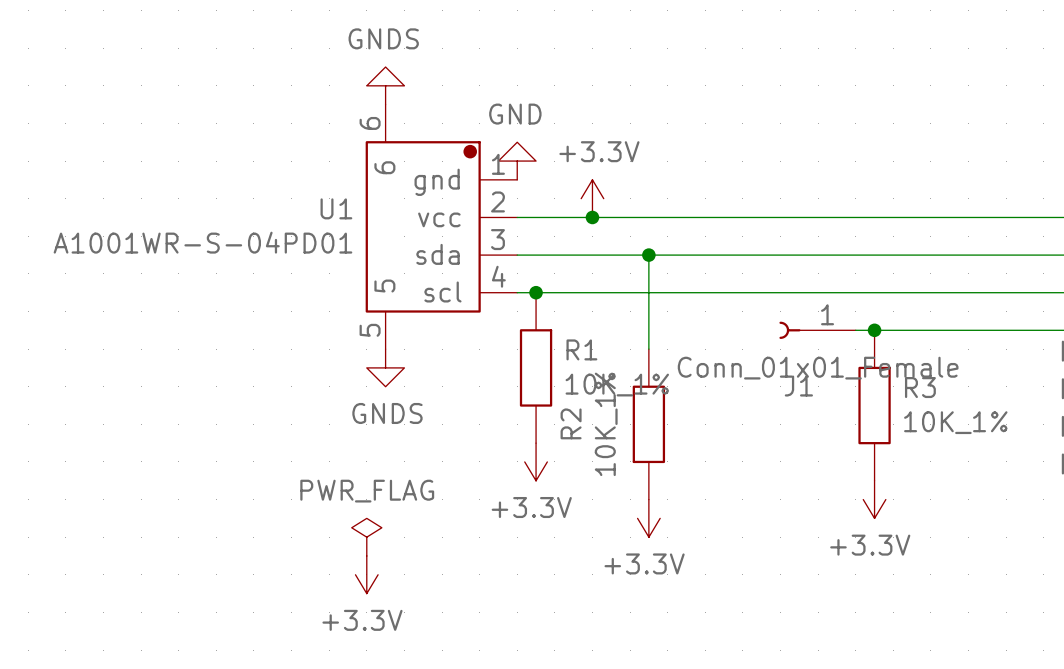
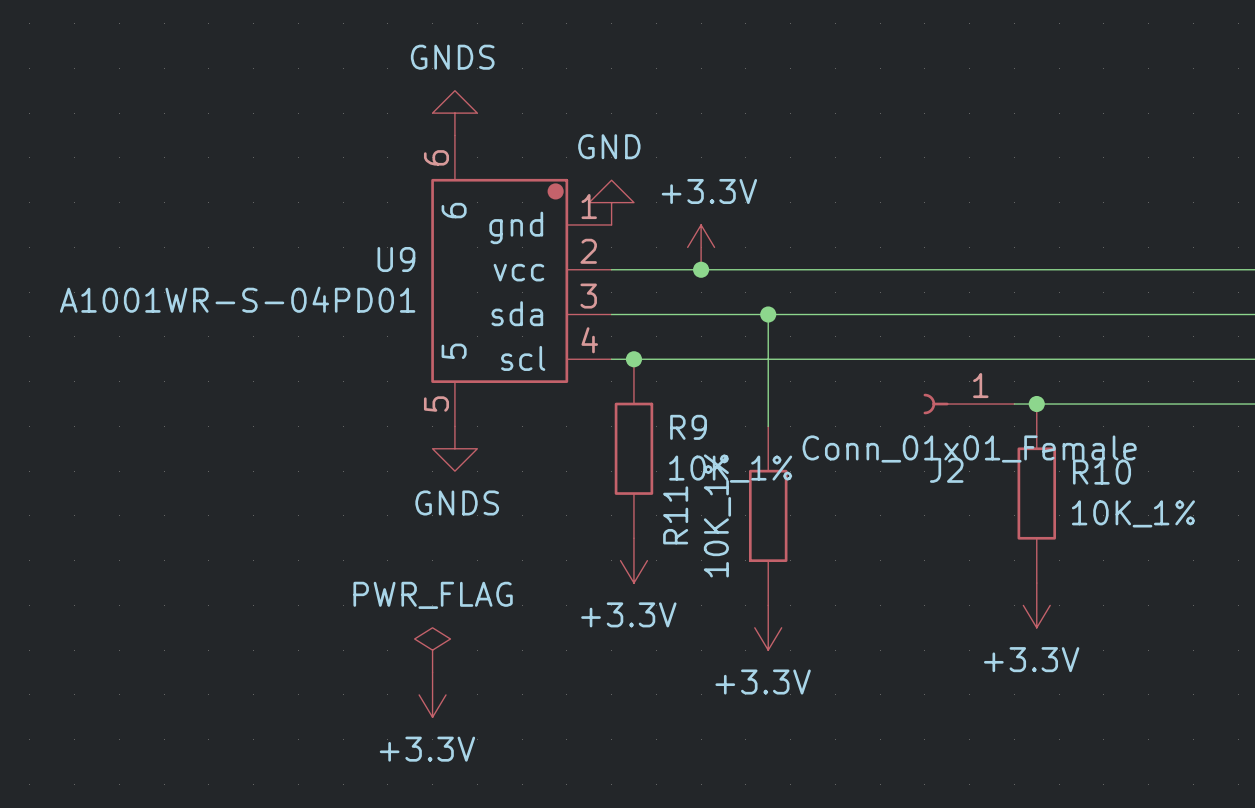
U1 name: U1 (336, 208) -> U9 (396, 259)
R1 name: R1 (581, 349) -> R9 (688, 427)
J1 name: J1 (798, 386) -> J2 (946, 470)
R3 name: R3 (920, 387) -> R10 (1102, 472)
R2 name: R2 (571, 423) -> R11 (675, 515)

